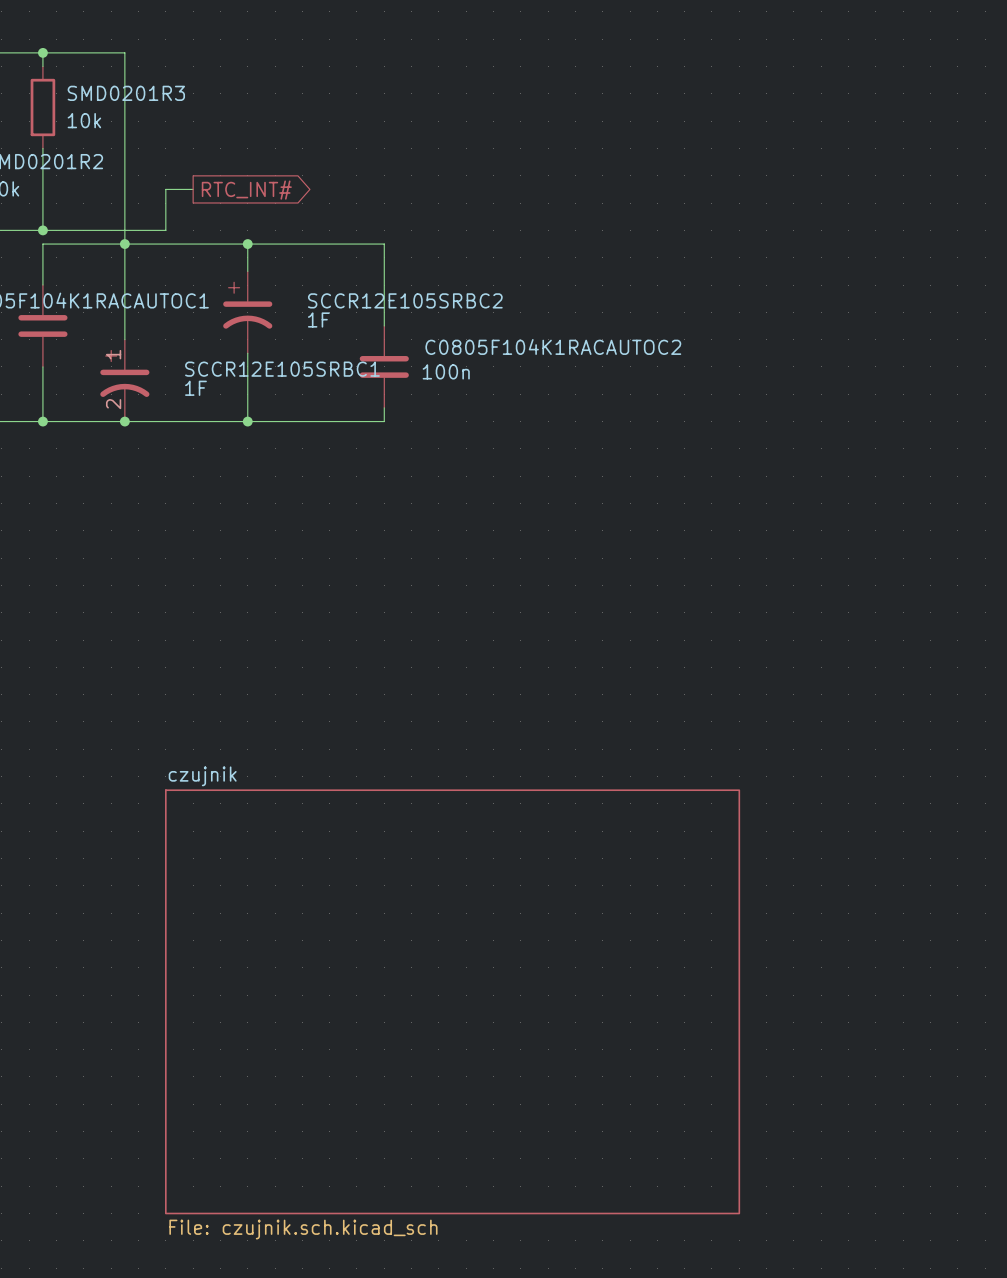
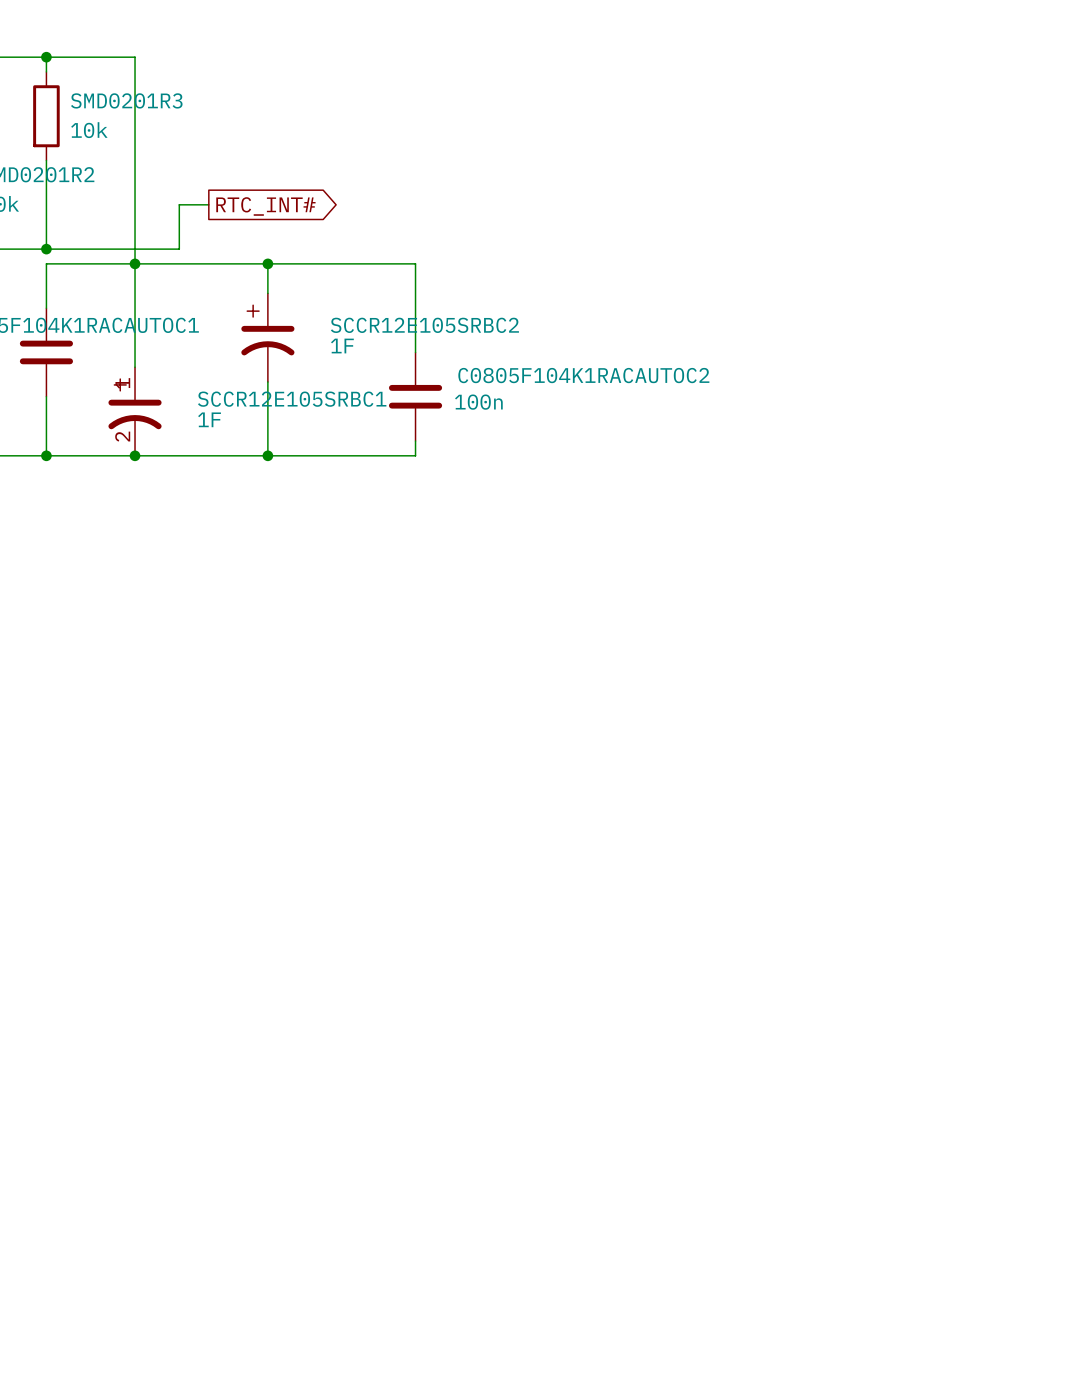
sheet czujnik: File: czujnik.sch.kicad_sch (452, 1001) -> none

